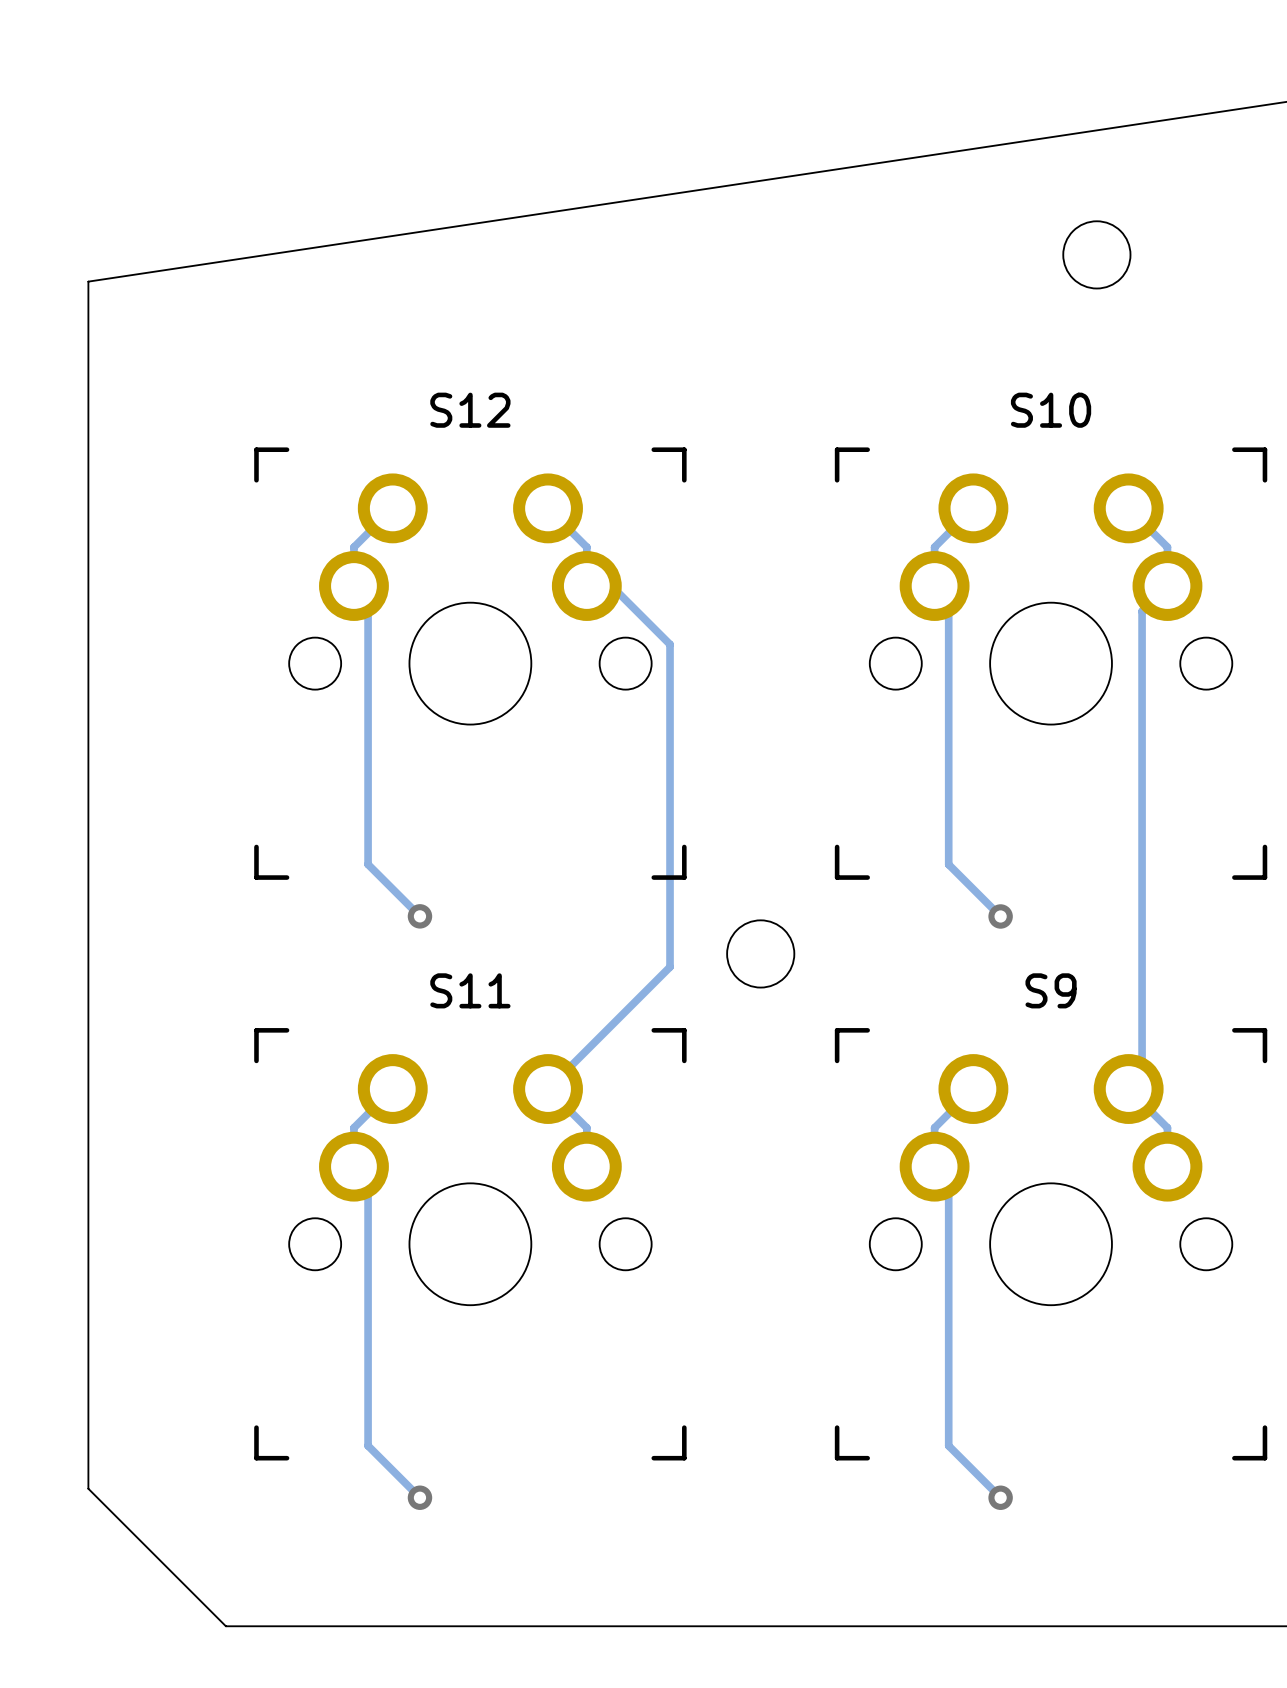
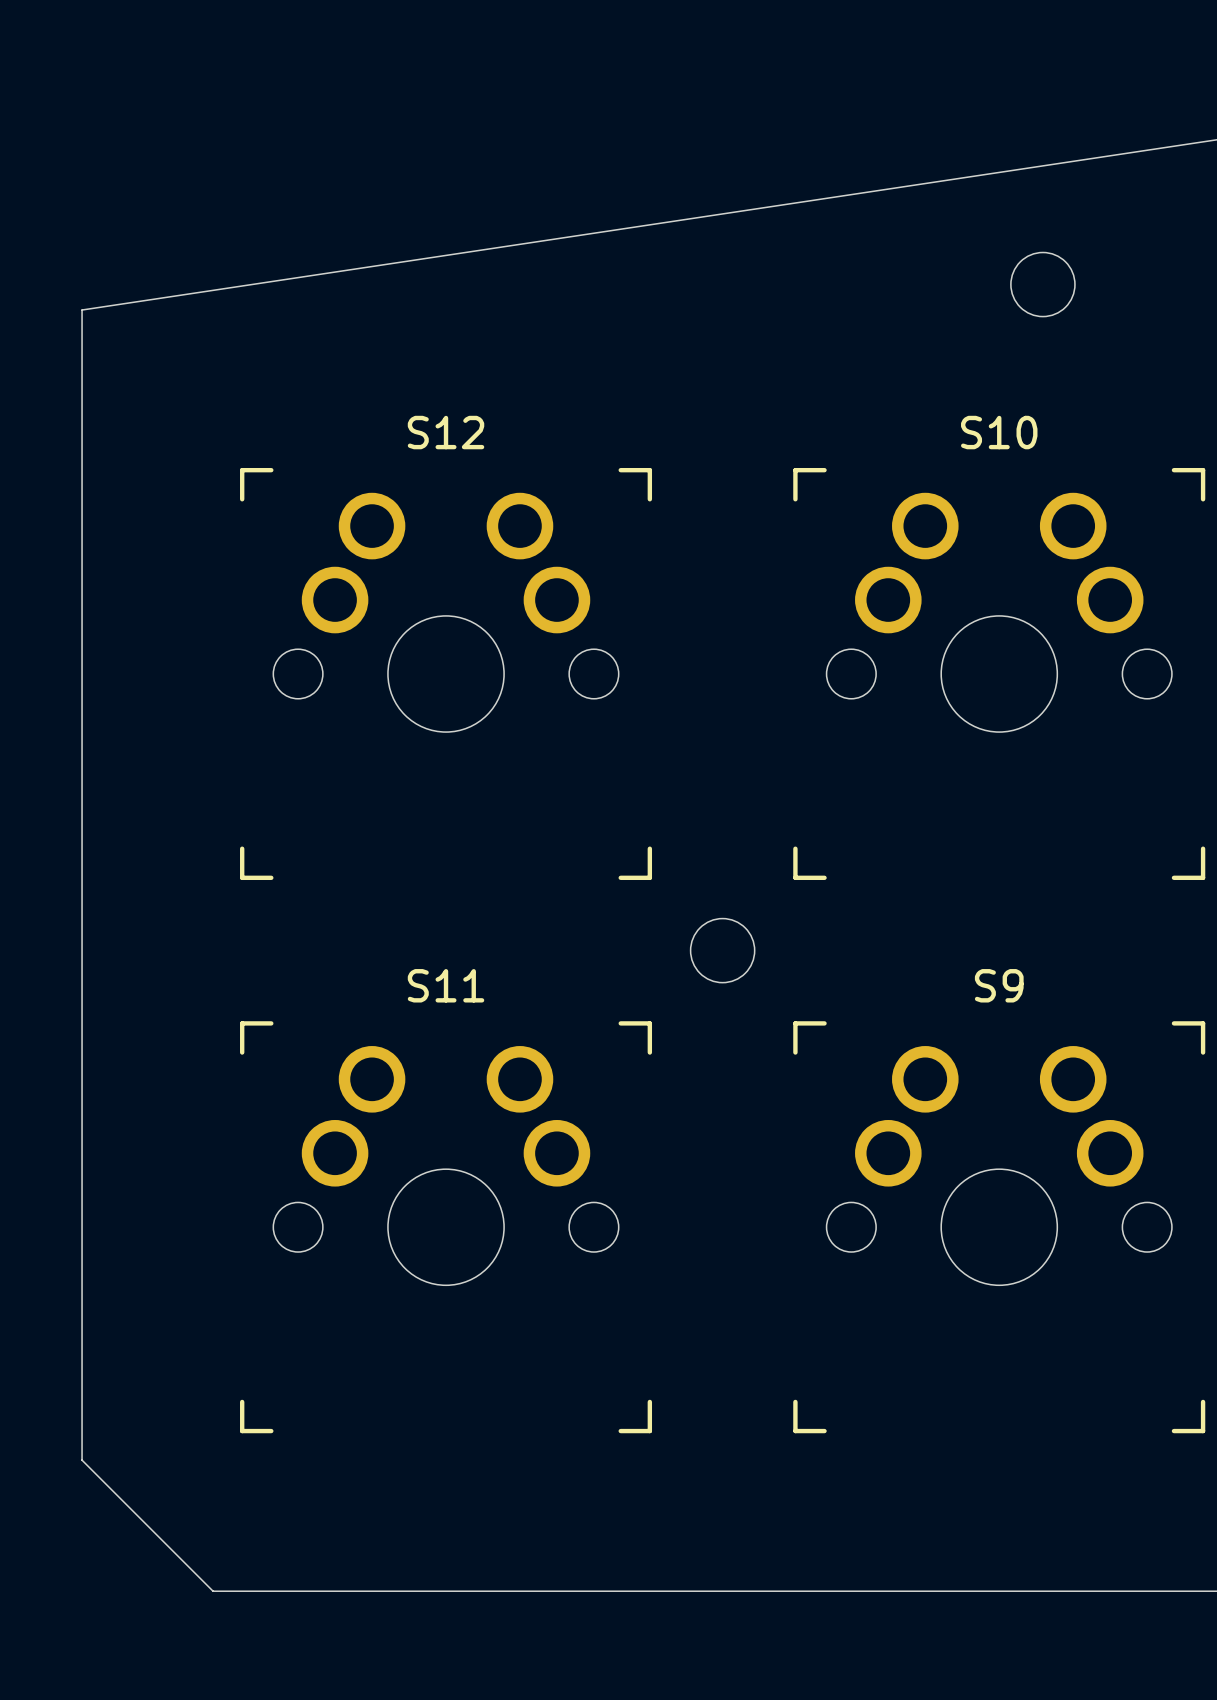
track: (392, 508) (353, 547) (353, 586) (368, 600) (368, 864) (419, 916) -> none
track: (548, 508) (586, 547) (586, 586) (611, 586) (670, 644) (670, 967) (548, 1089) (586, 1127) (586, 1166) -> none
track: (973, 508) (934, 547) (934, 586) (948, 600) (948, 864) (1000, 916) -> none
track: (1128, 508) (1167, 547) (1167, 586) (1142, 611) (1142, 1075) (1128, 1089) (1167, 1127) (1167, 1166) -> none
via: (419, 916) -> none
via: (1000, 916) -> none
track: (392, 1089) (353, 1127) (353, 1166) (368, 1180) (368, 1445) (419, 1497) -> none
track: (973, 1089) (934, 1127) (934, 1166) (948, 1180) (948, 1445) (1000, 1497) -> none
via: (419, 1497) -> none
via: (1000, 1497) -> none

